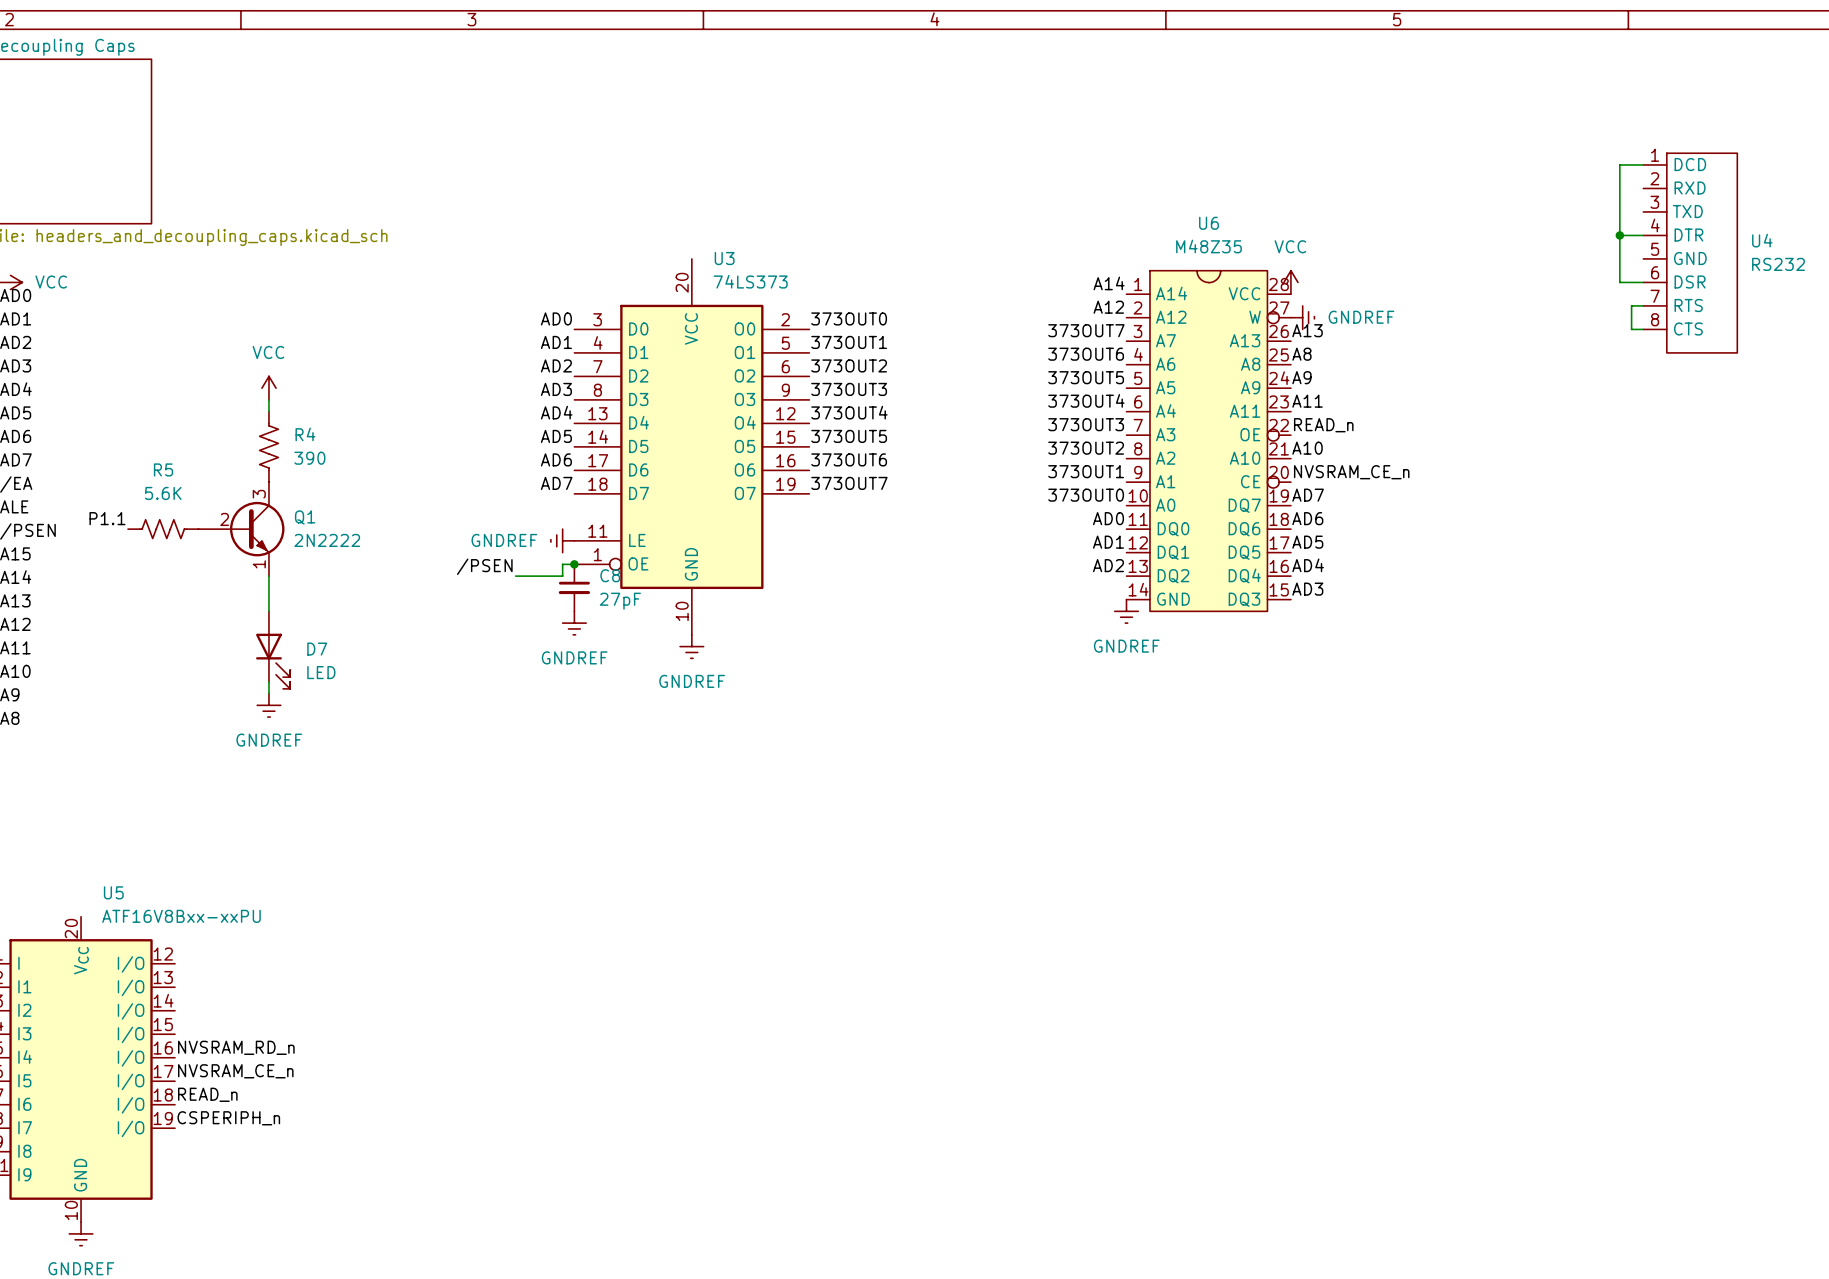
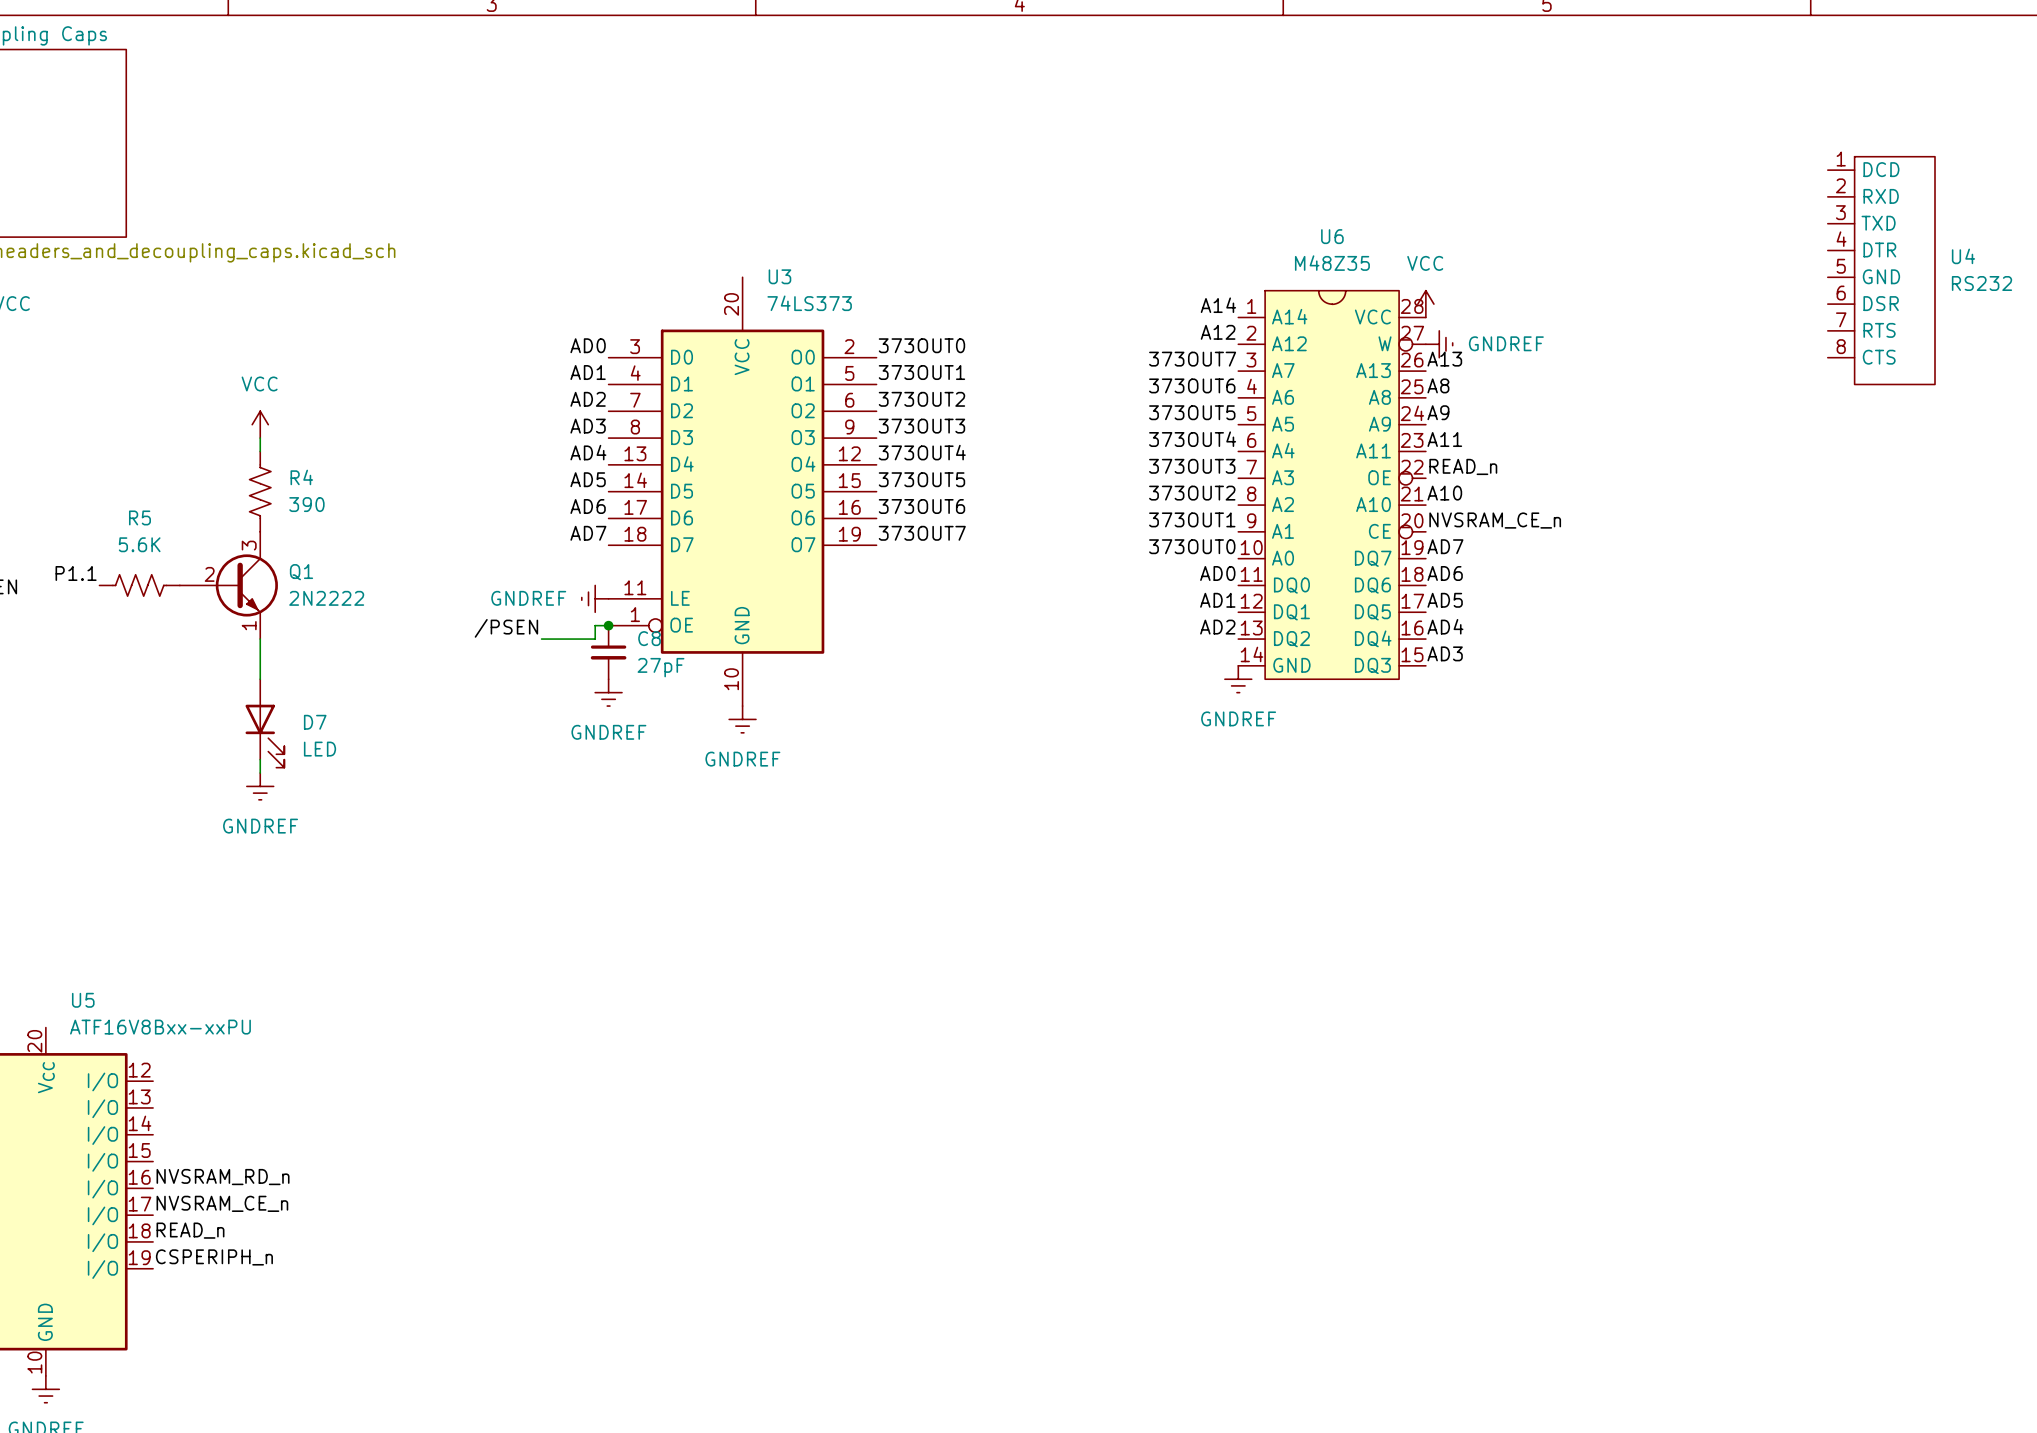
wire: (1643, 164) (1619, 164) (1619, 282) (1643, 282) -> none
wire: (1619, 235) (1643, 235) -> none
junction: (1619, 235) -> none
wire: (1643, 305) (1631, 305) (1631, 329) (1643, 329) -> none

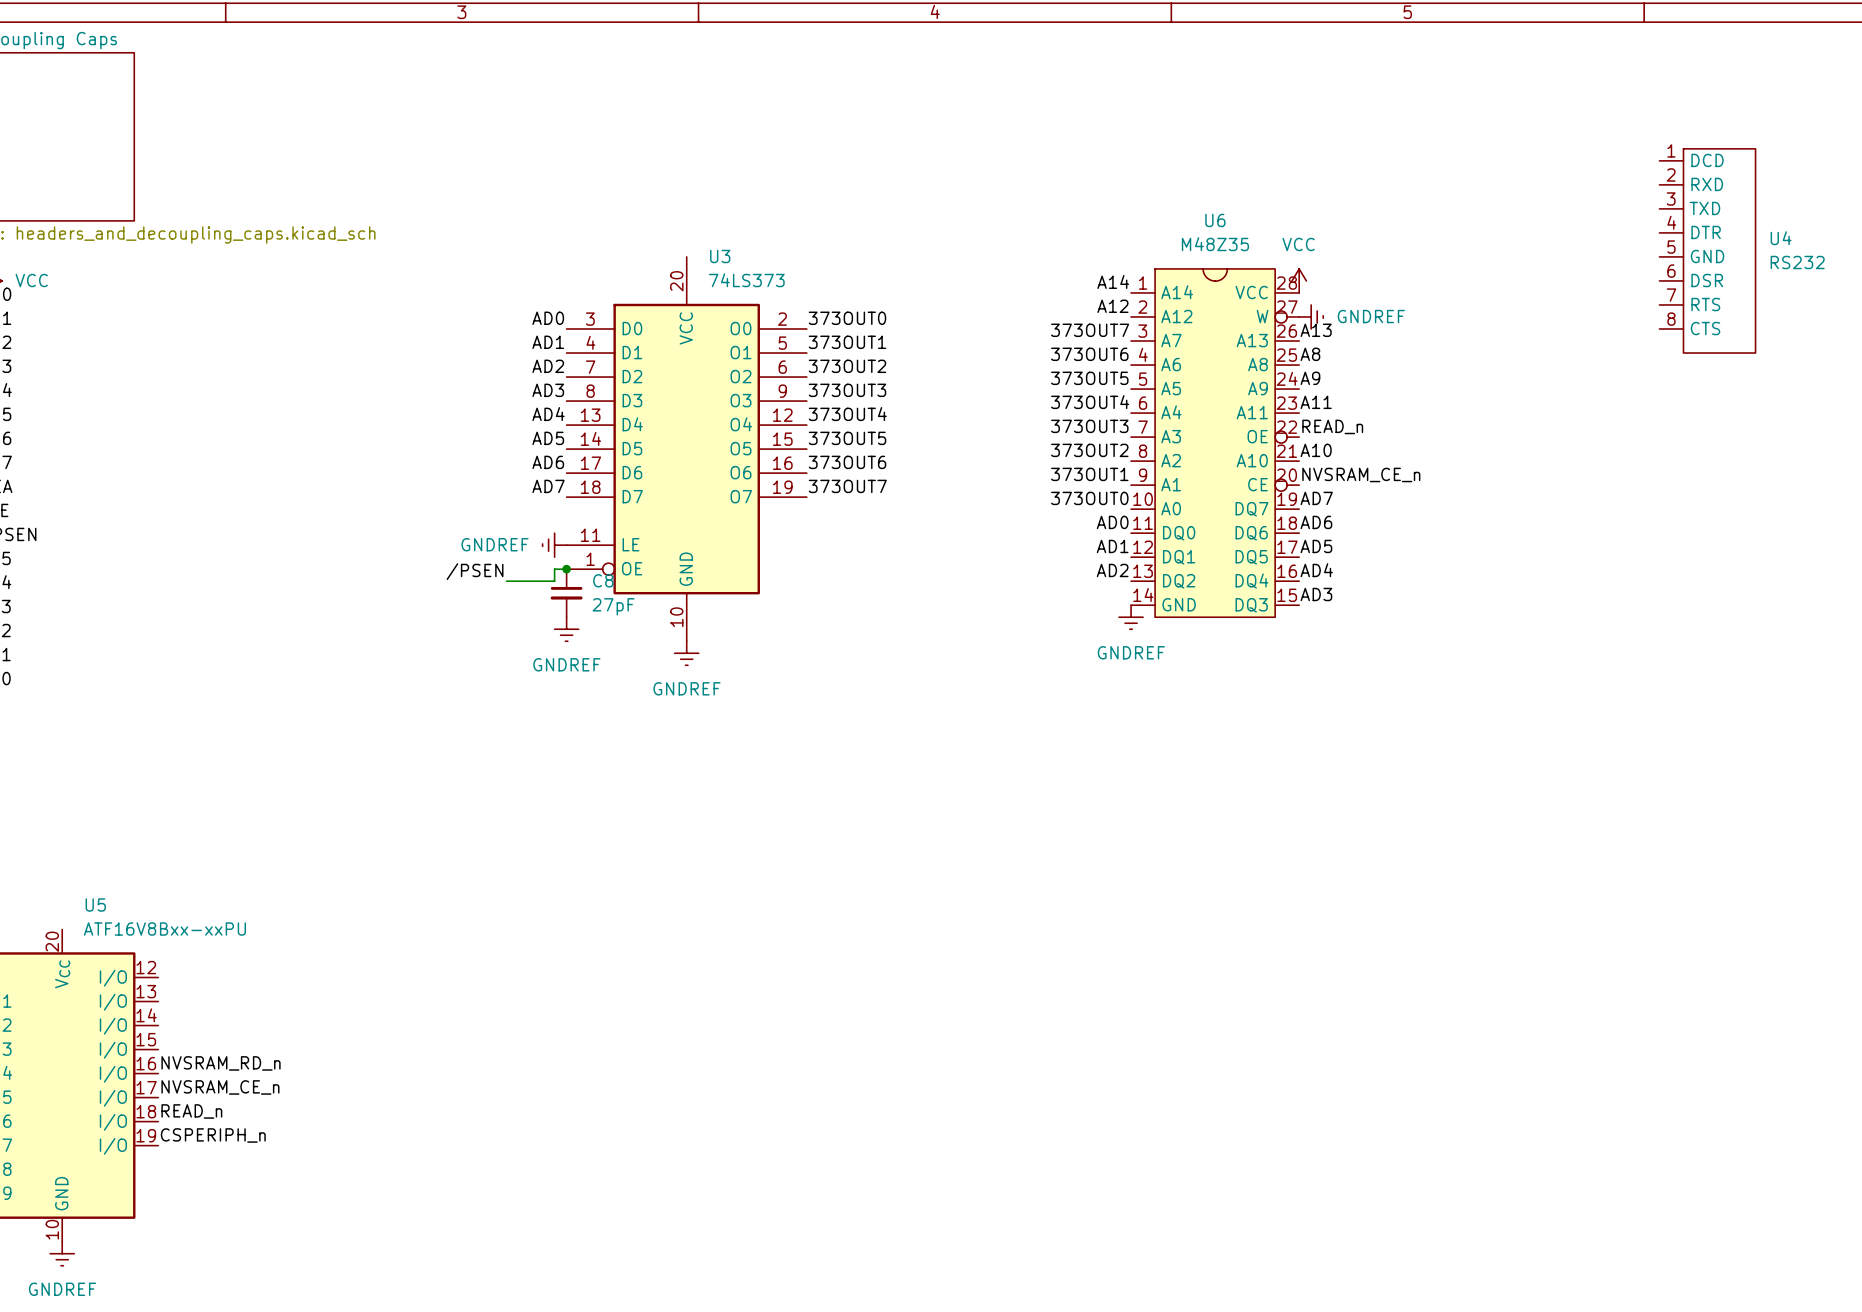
power symbol: VCC (260, 424) -> none
wire: (260, 438) (260, 451) -> none
R4: 390 (260, 491) -> none
label: P1.1 (76, 573) -> none
R5: 5.6K (139, 585) -> none
Q1: 2N2222 (228, 585) -> none
wire: (260, 639) (260, 679) -> none
D7: LED (264, 723) -> none
wire: (260, 759) (260, 773) -> none
power symbol: GNDREF (260, 786) -> none

